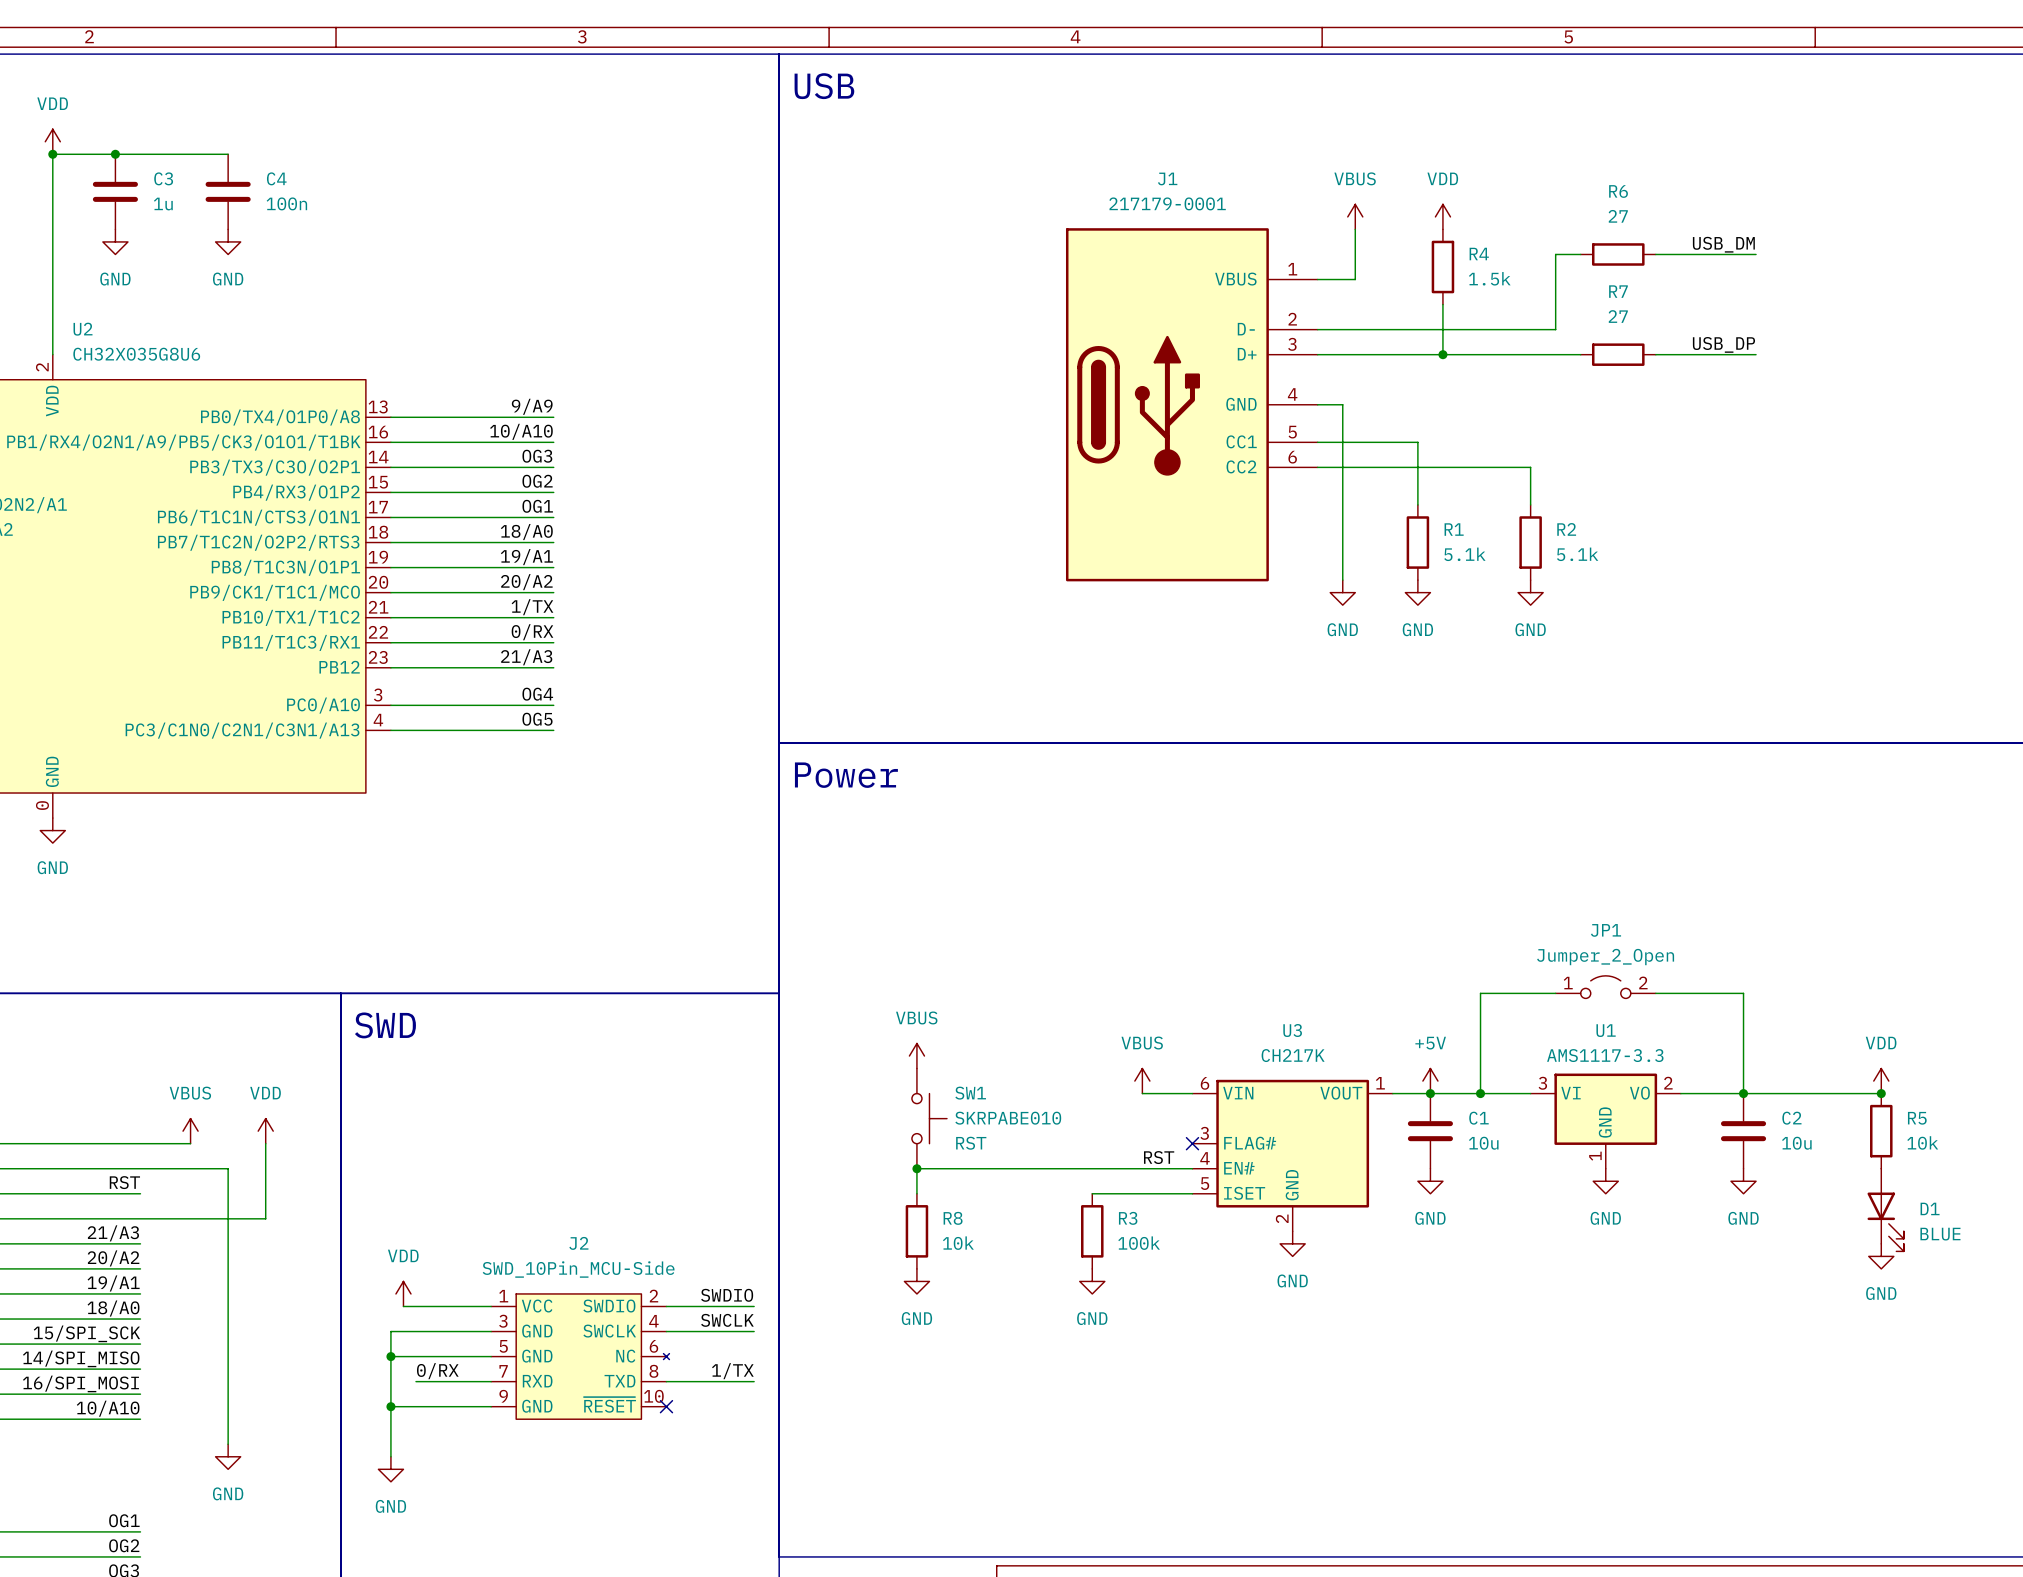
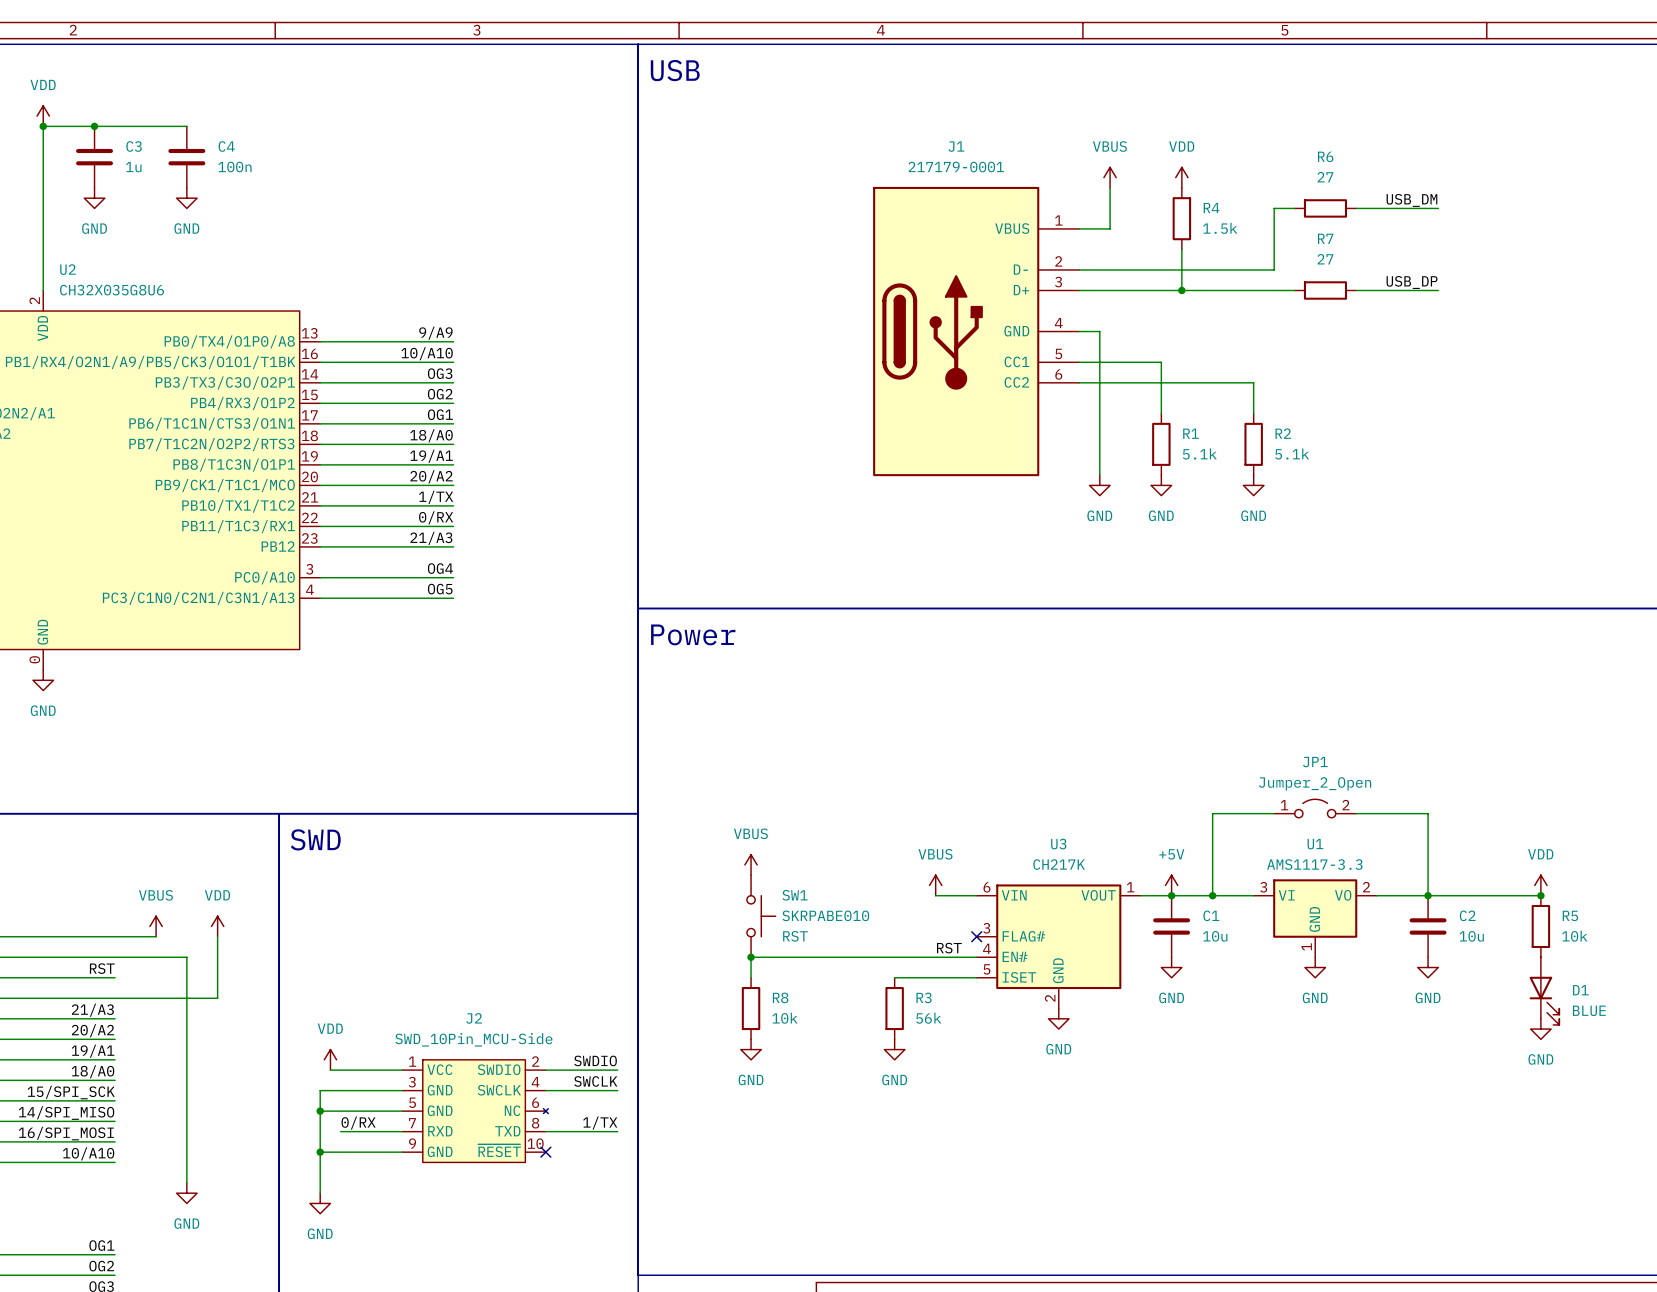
R3 value: 100k (1139, 1243) -> 56k (928, 1018)

